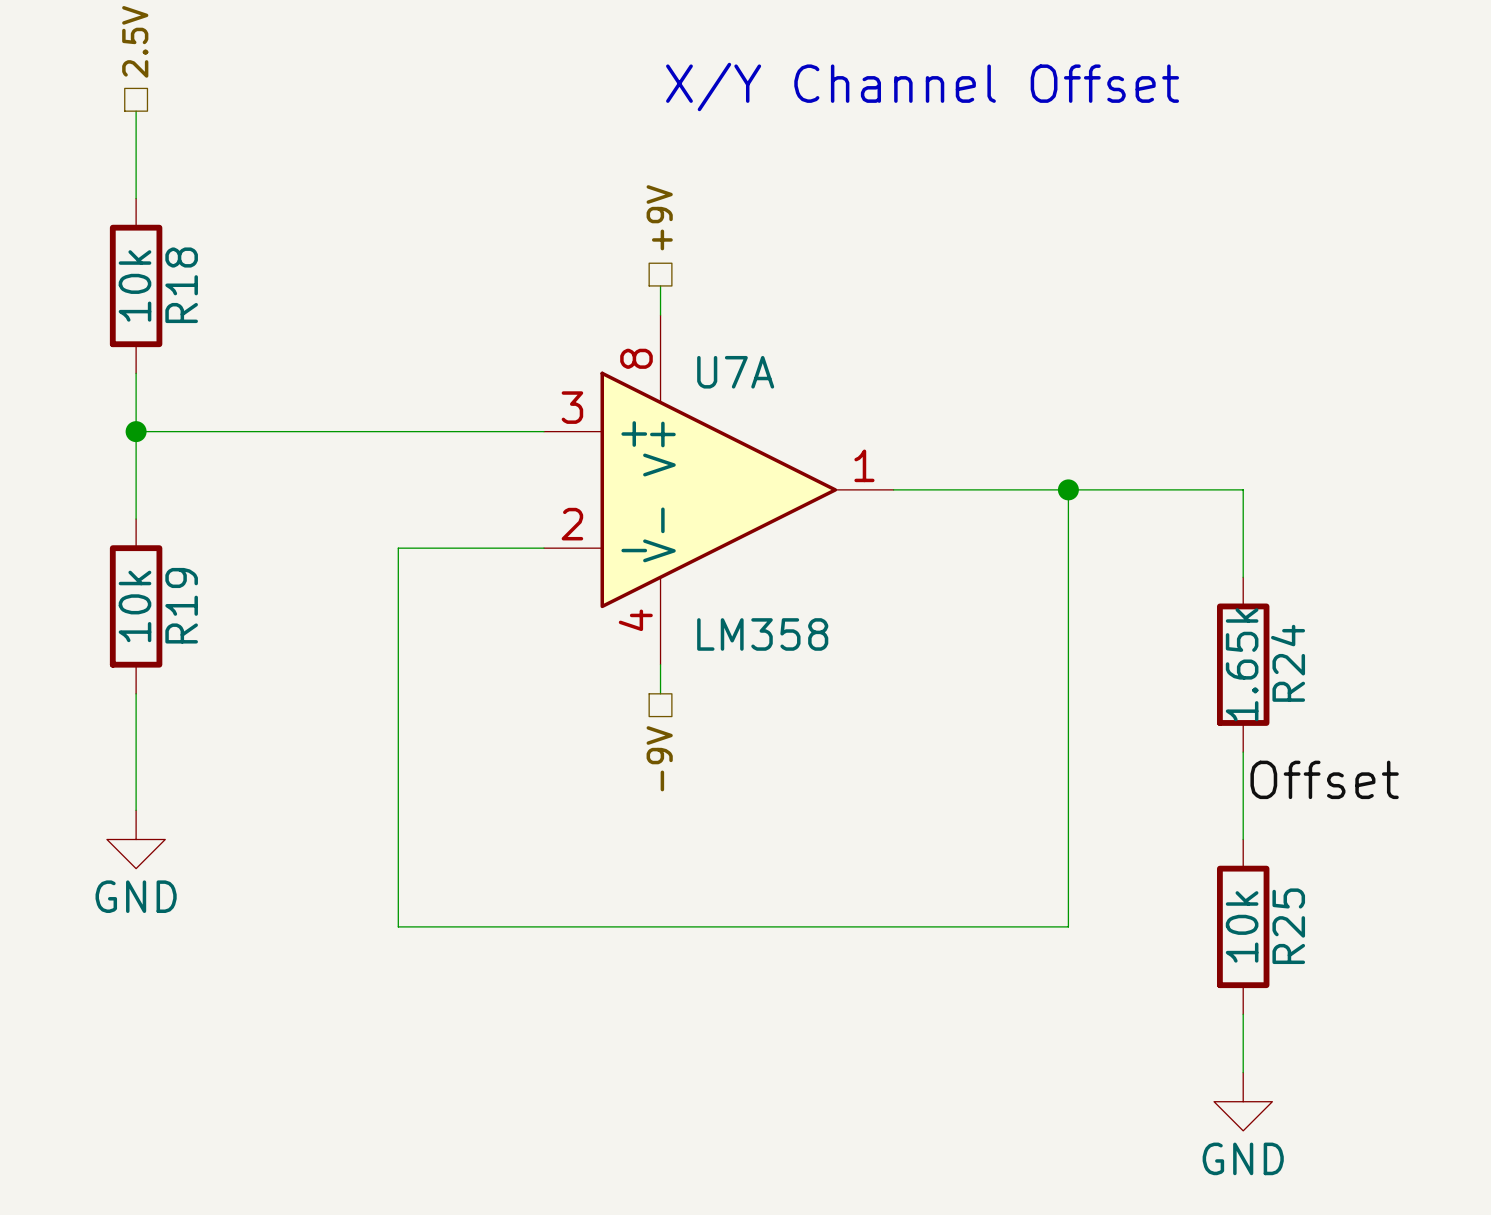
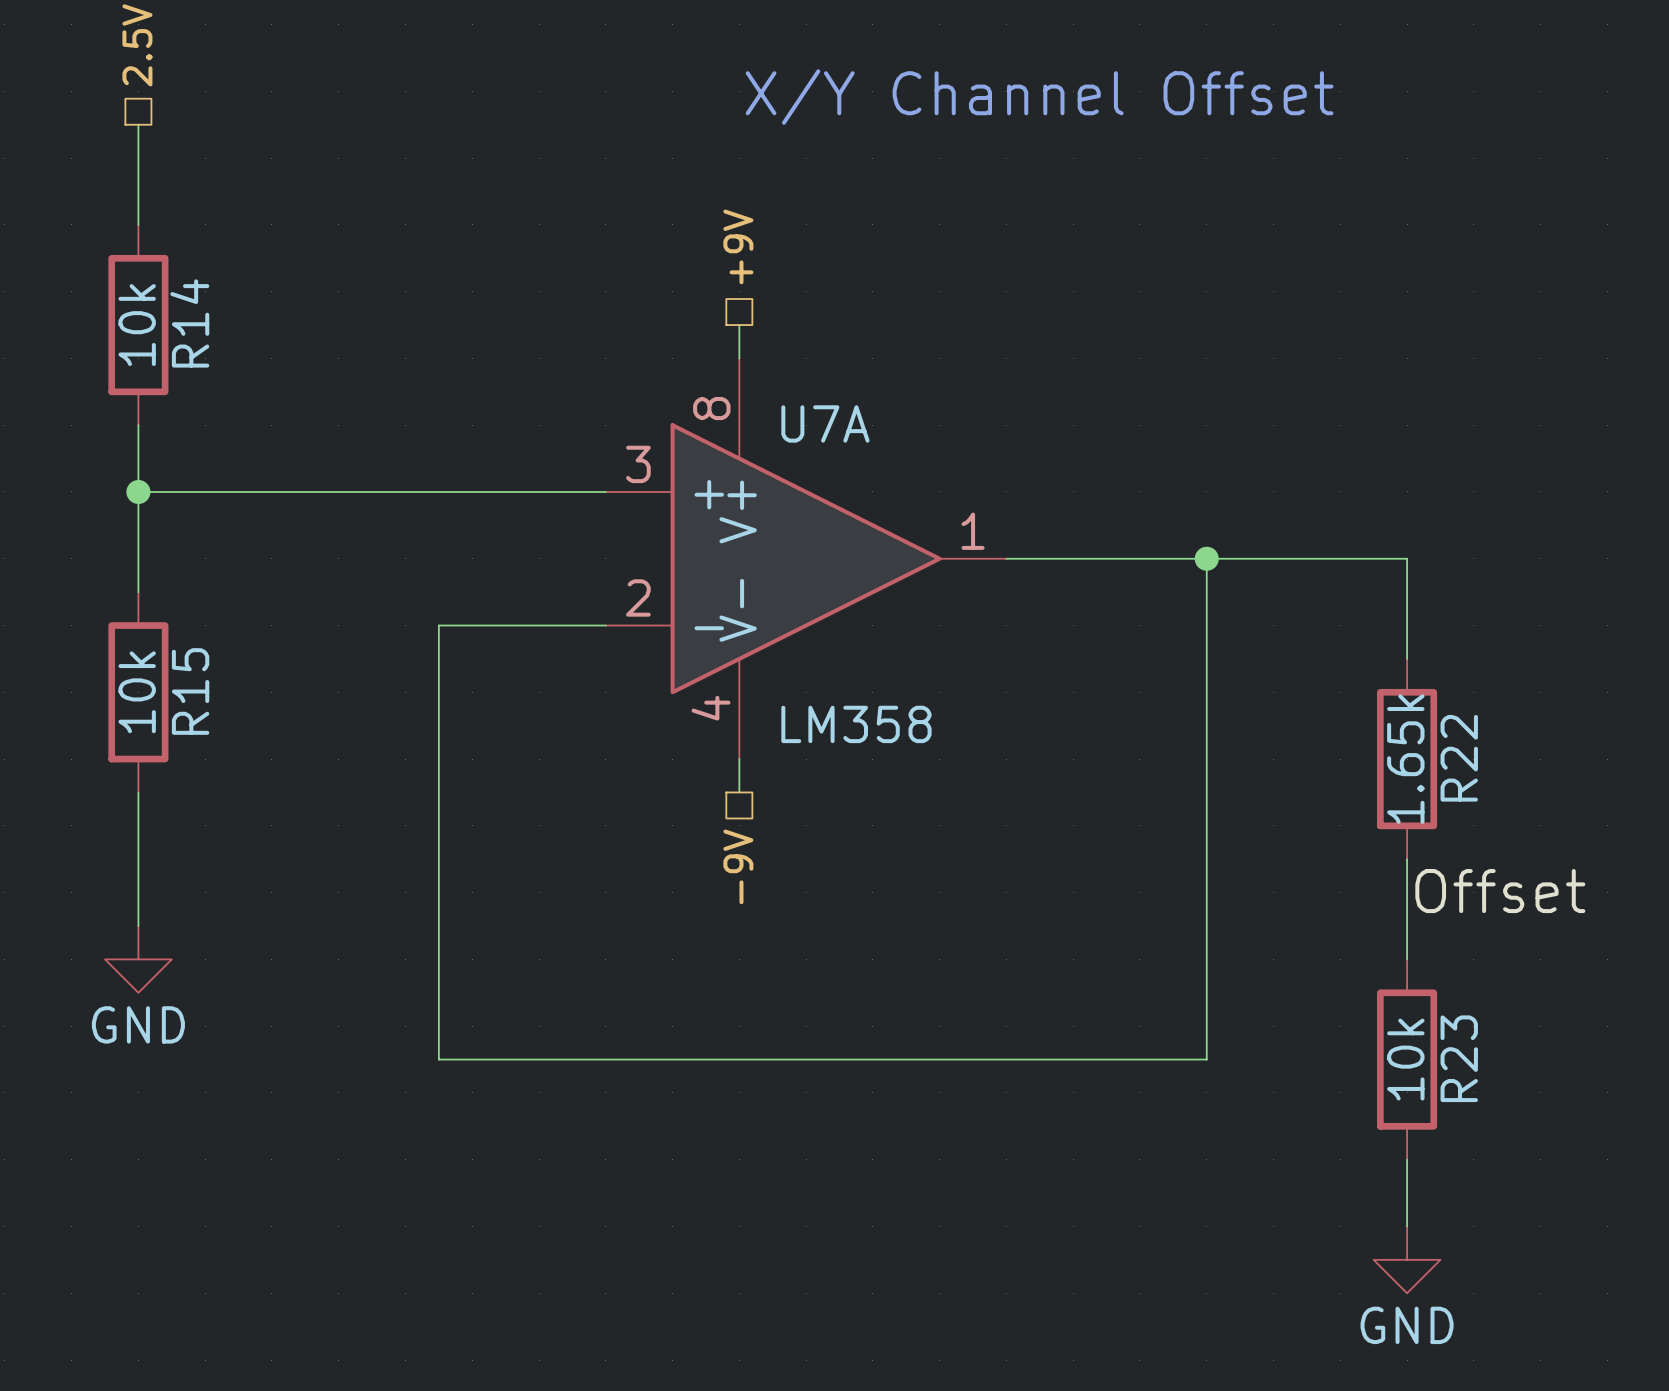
R18 name: R18 (181, 285) -> R14 (189, 323)
R19 name: R19 (181, 605) -> R15 (190, 691)
R24 name: R24 (1288, 663) -> R22 (1459, 758)
R25 name: R25 (1288, 926) -> R23 (1459, 1058)

